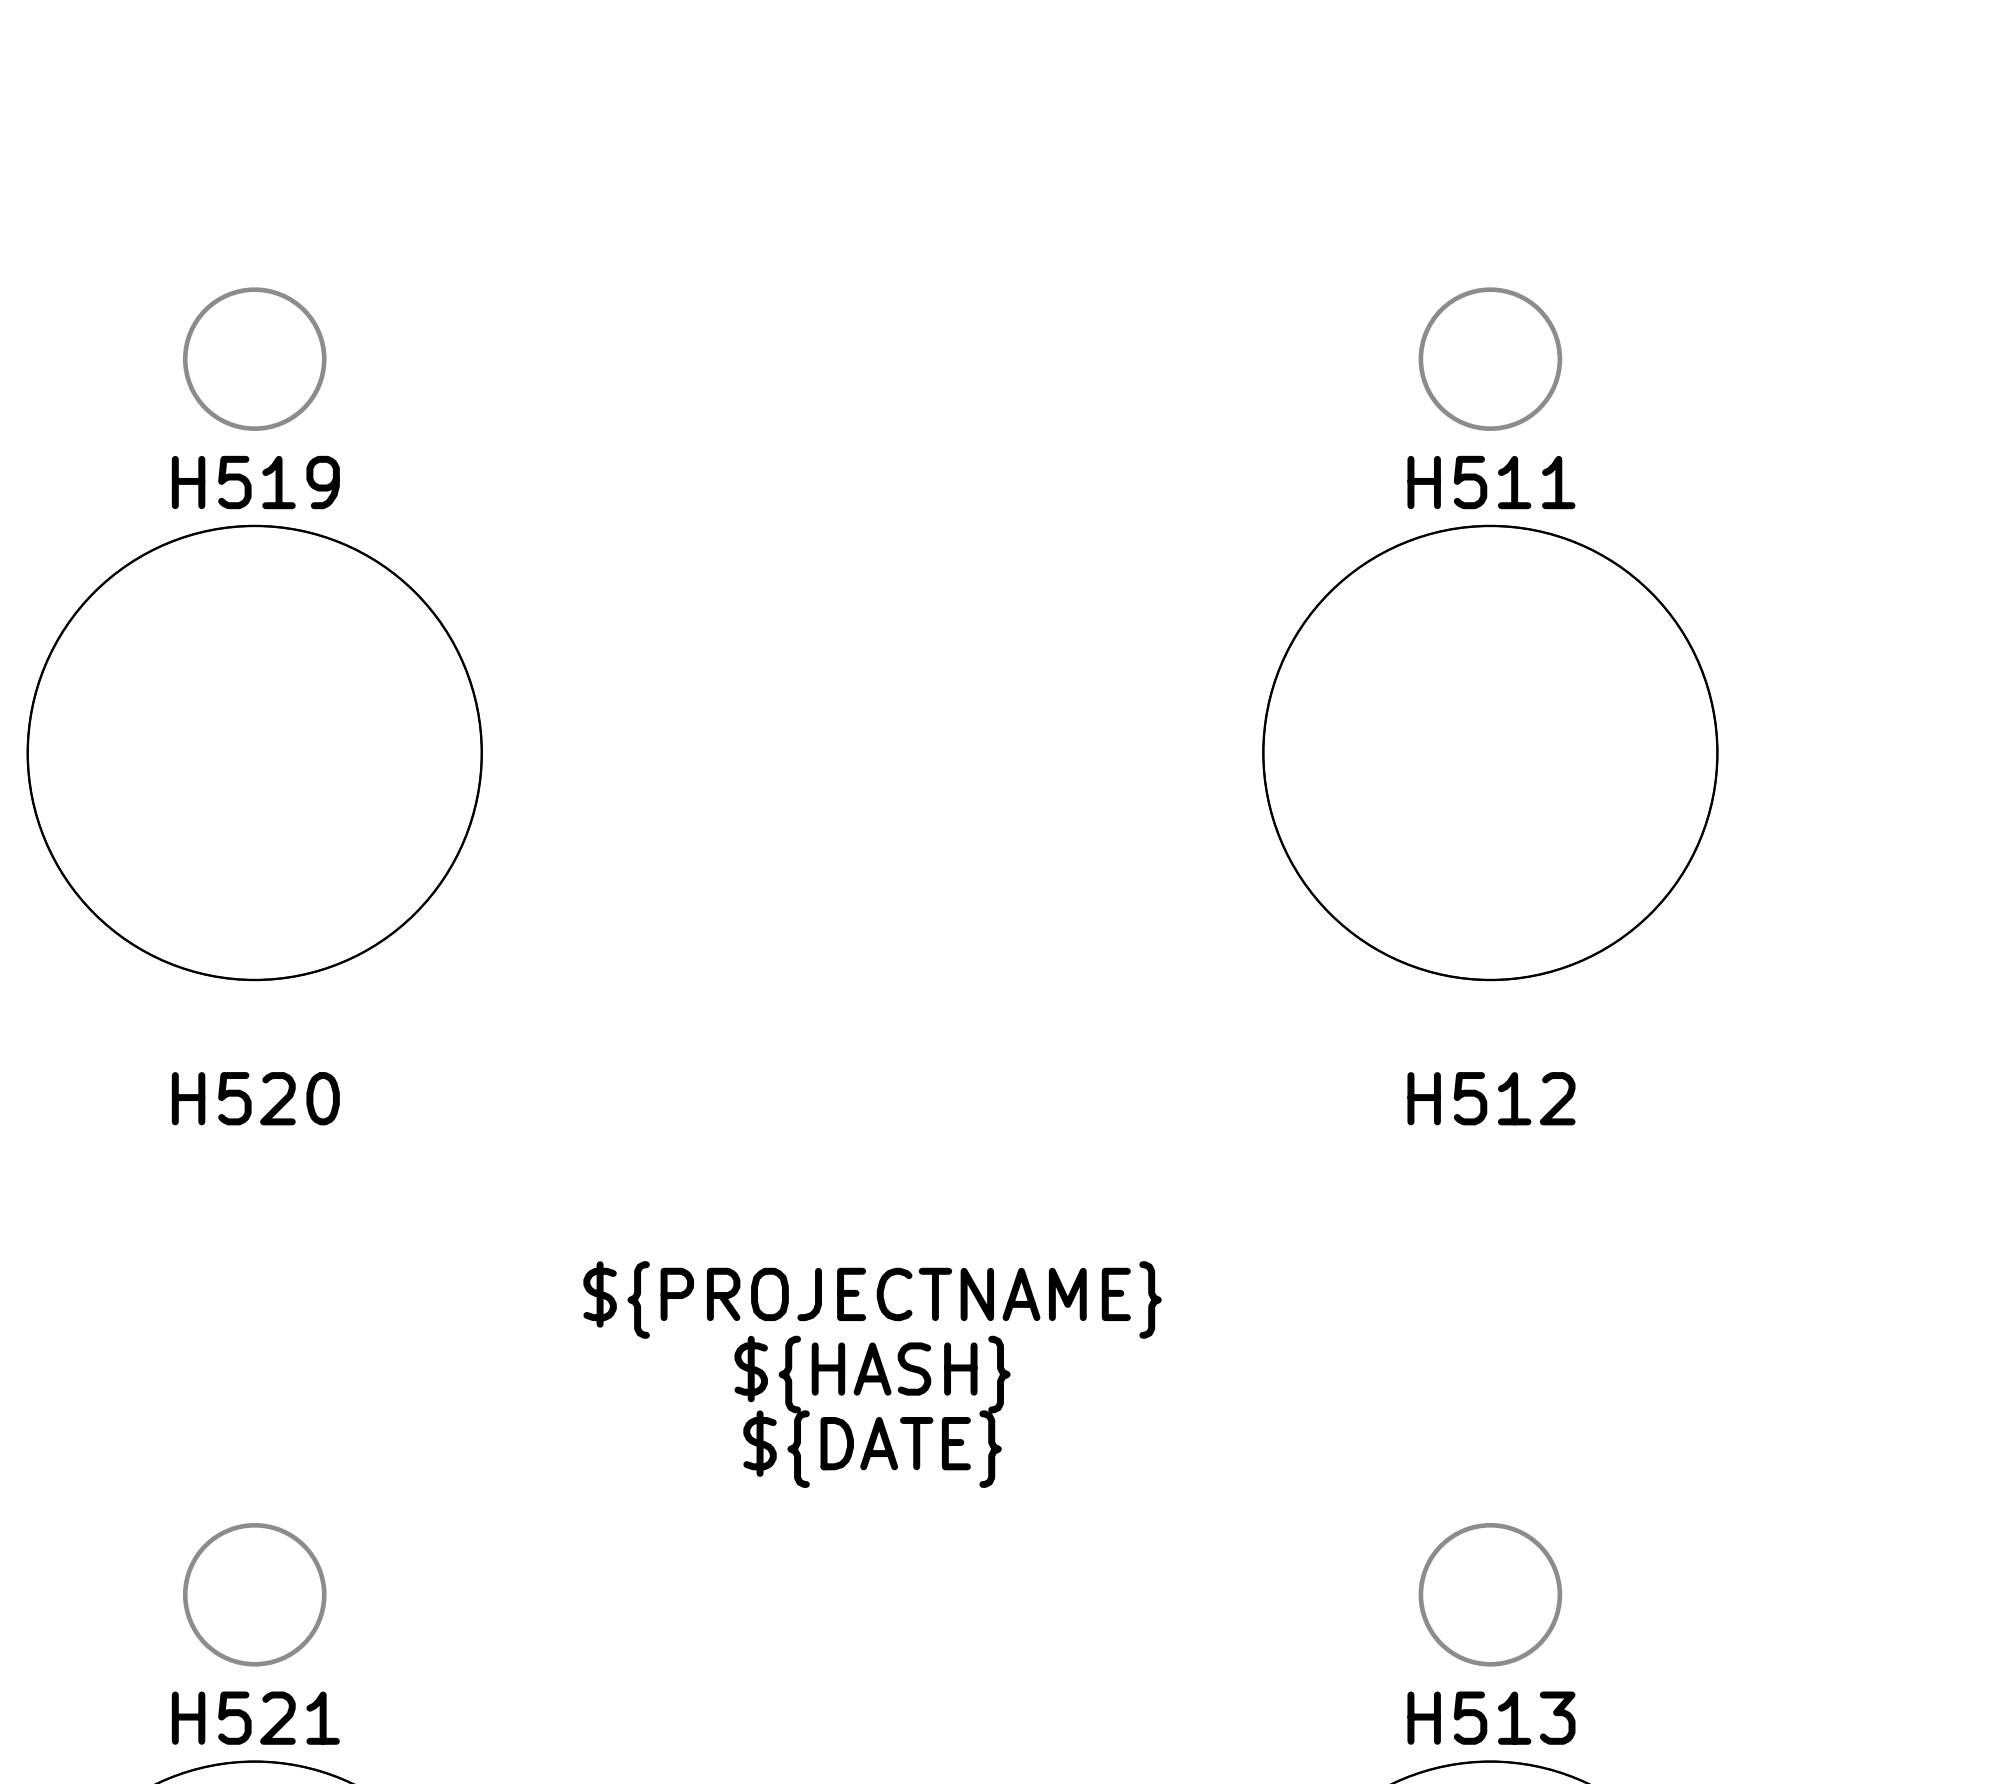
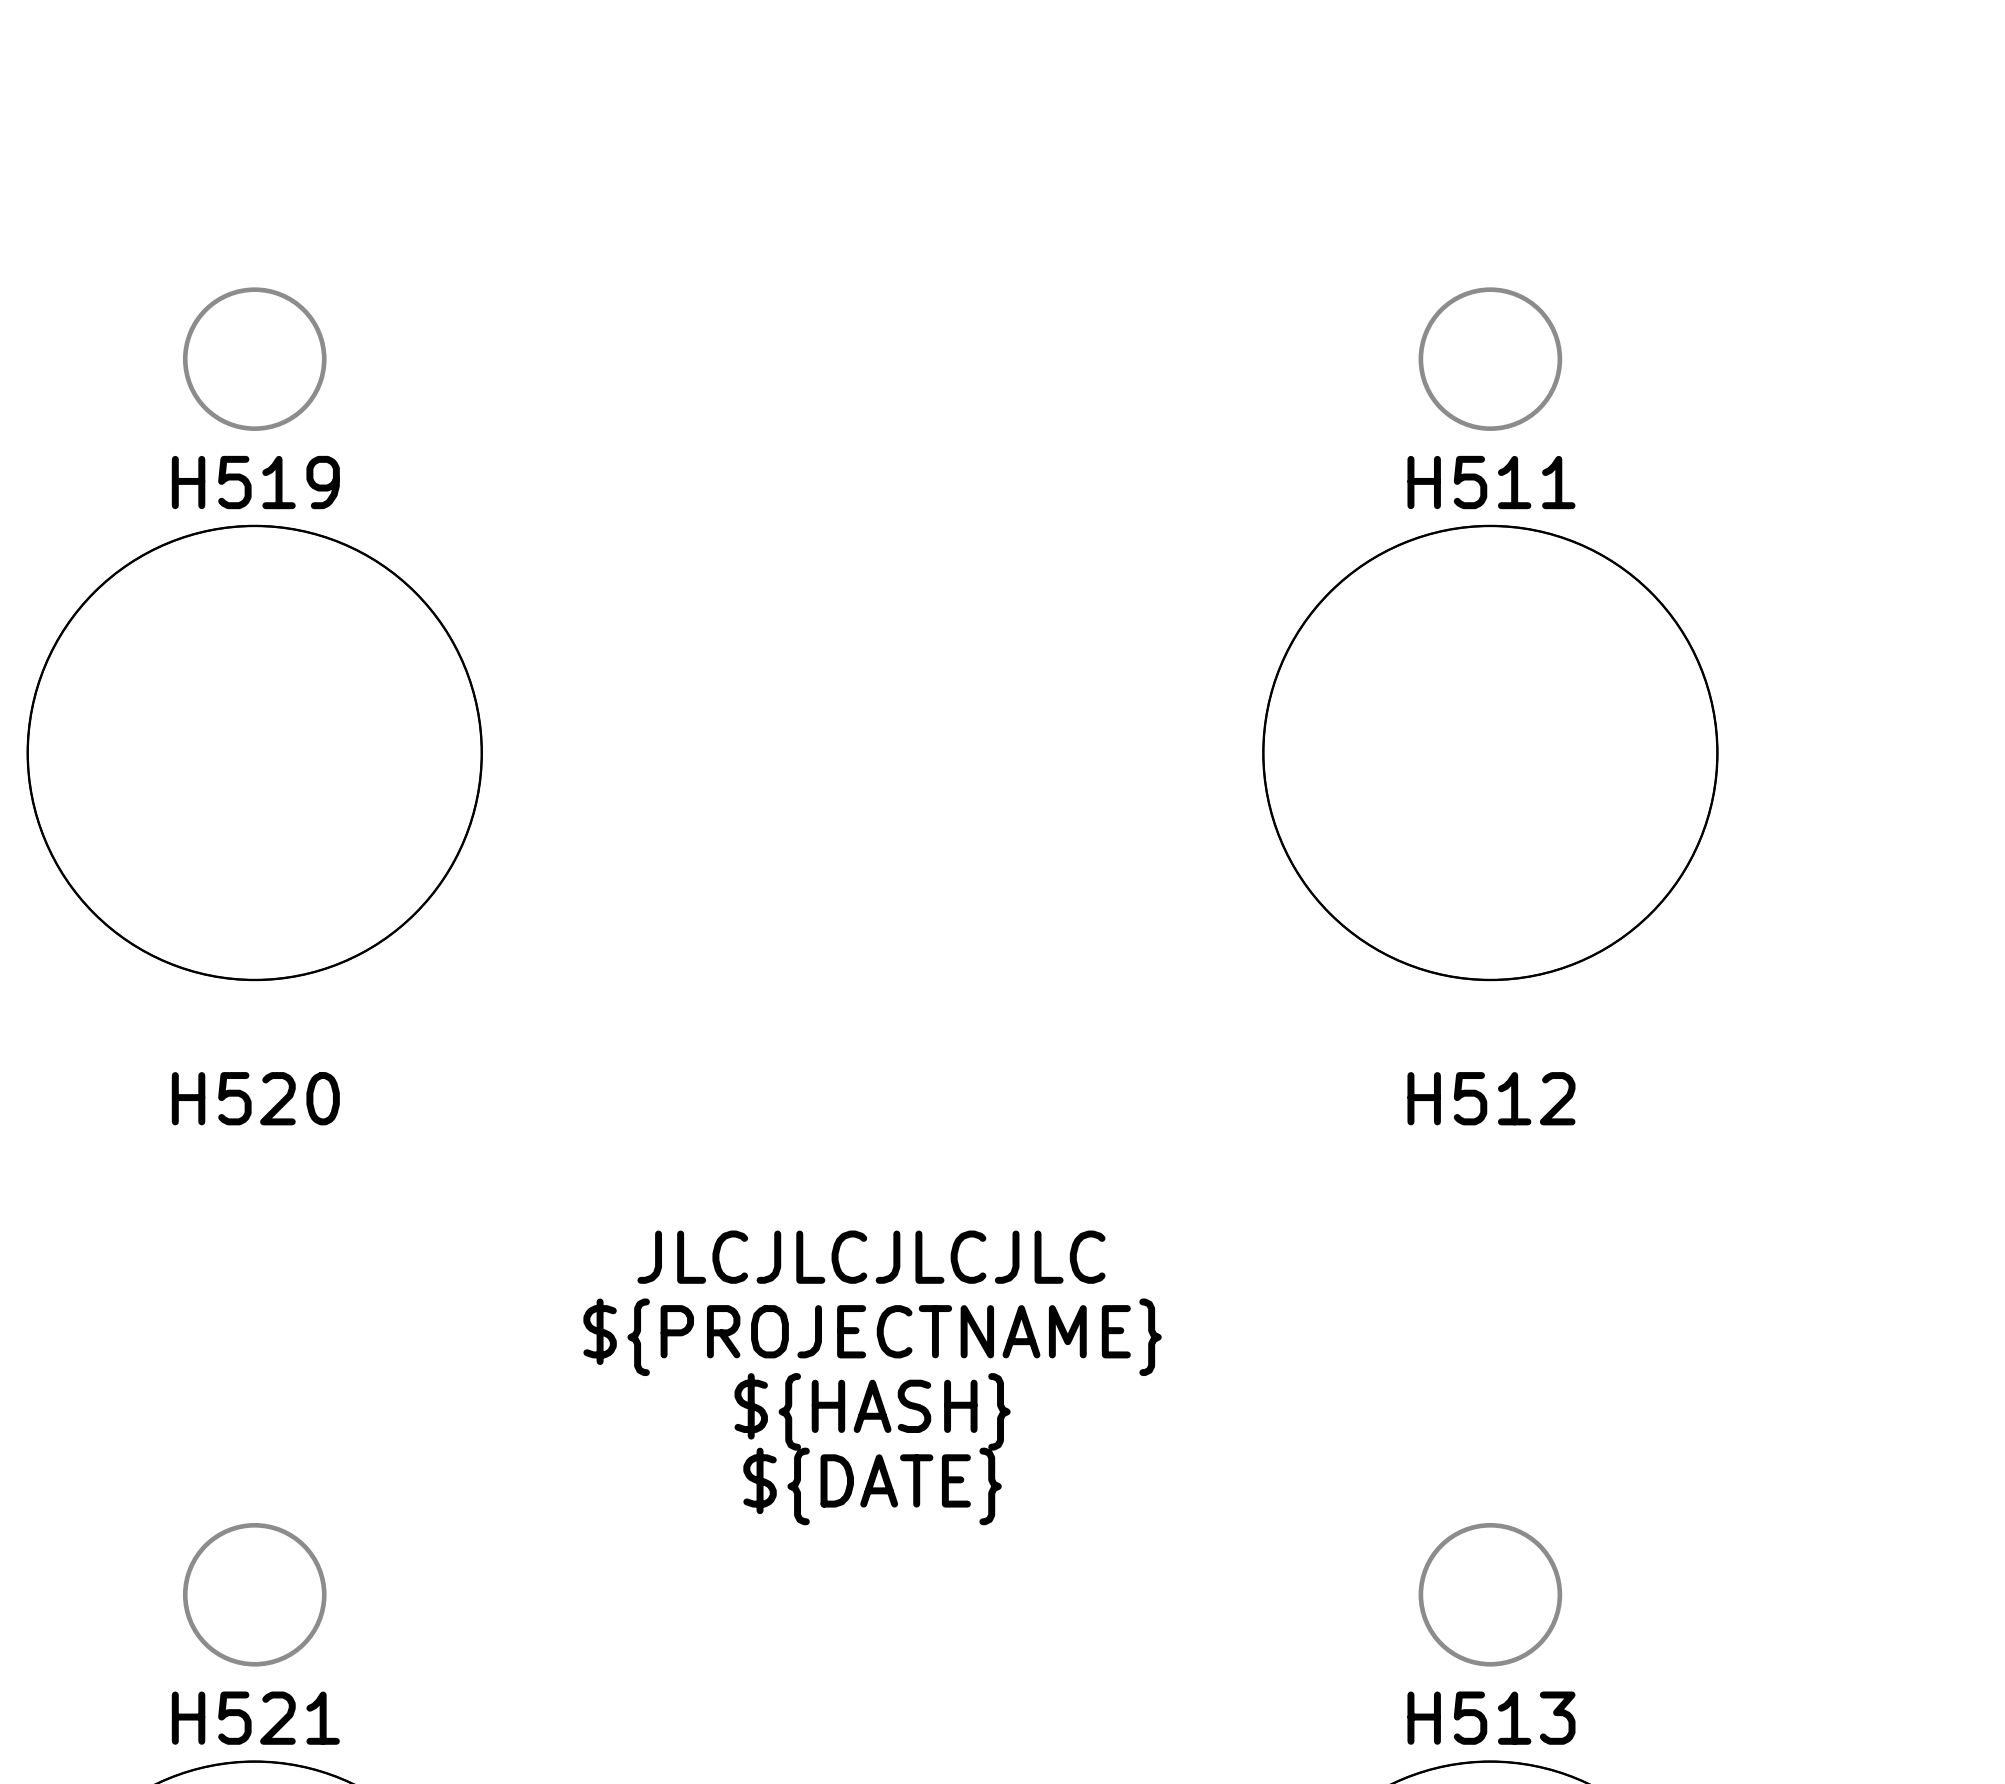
text: none -> JLCJLCJLCJLC (871, 1257)
text position: ${PROJECTNAME} (872, 1299) -> ${PROJECTNAME} (872, 1337)
text position: ${HASH} (872, 1374) -> ${HASH} (872, 1411)
text position: ${DATE} (872, 1449) -> ${DATE} (872, 1486)

